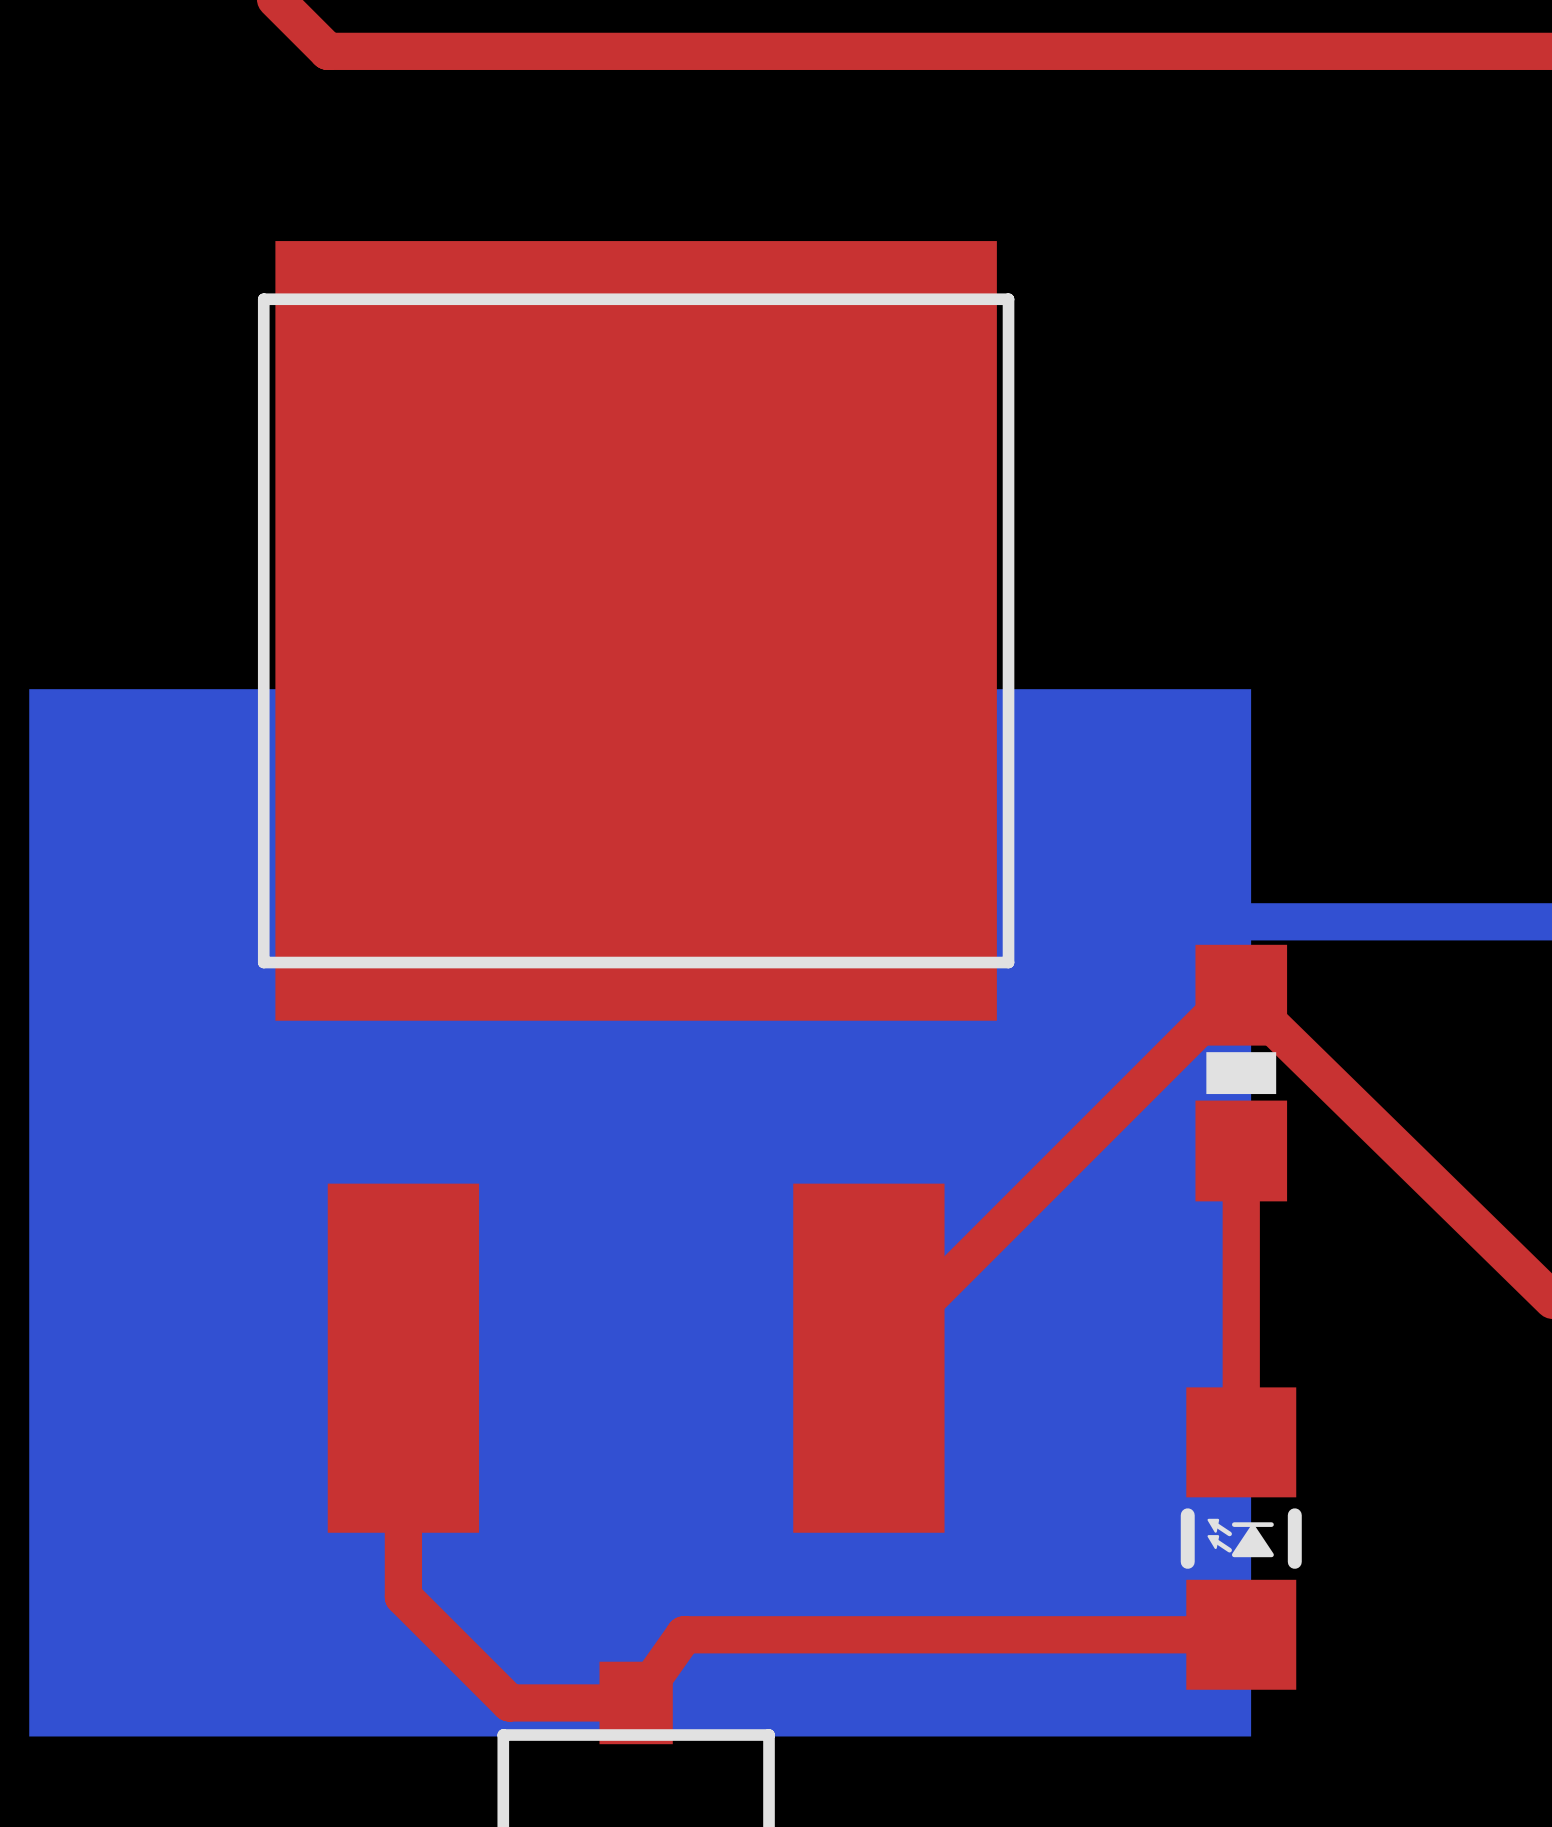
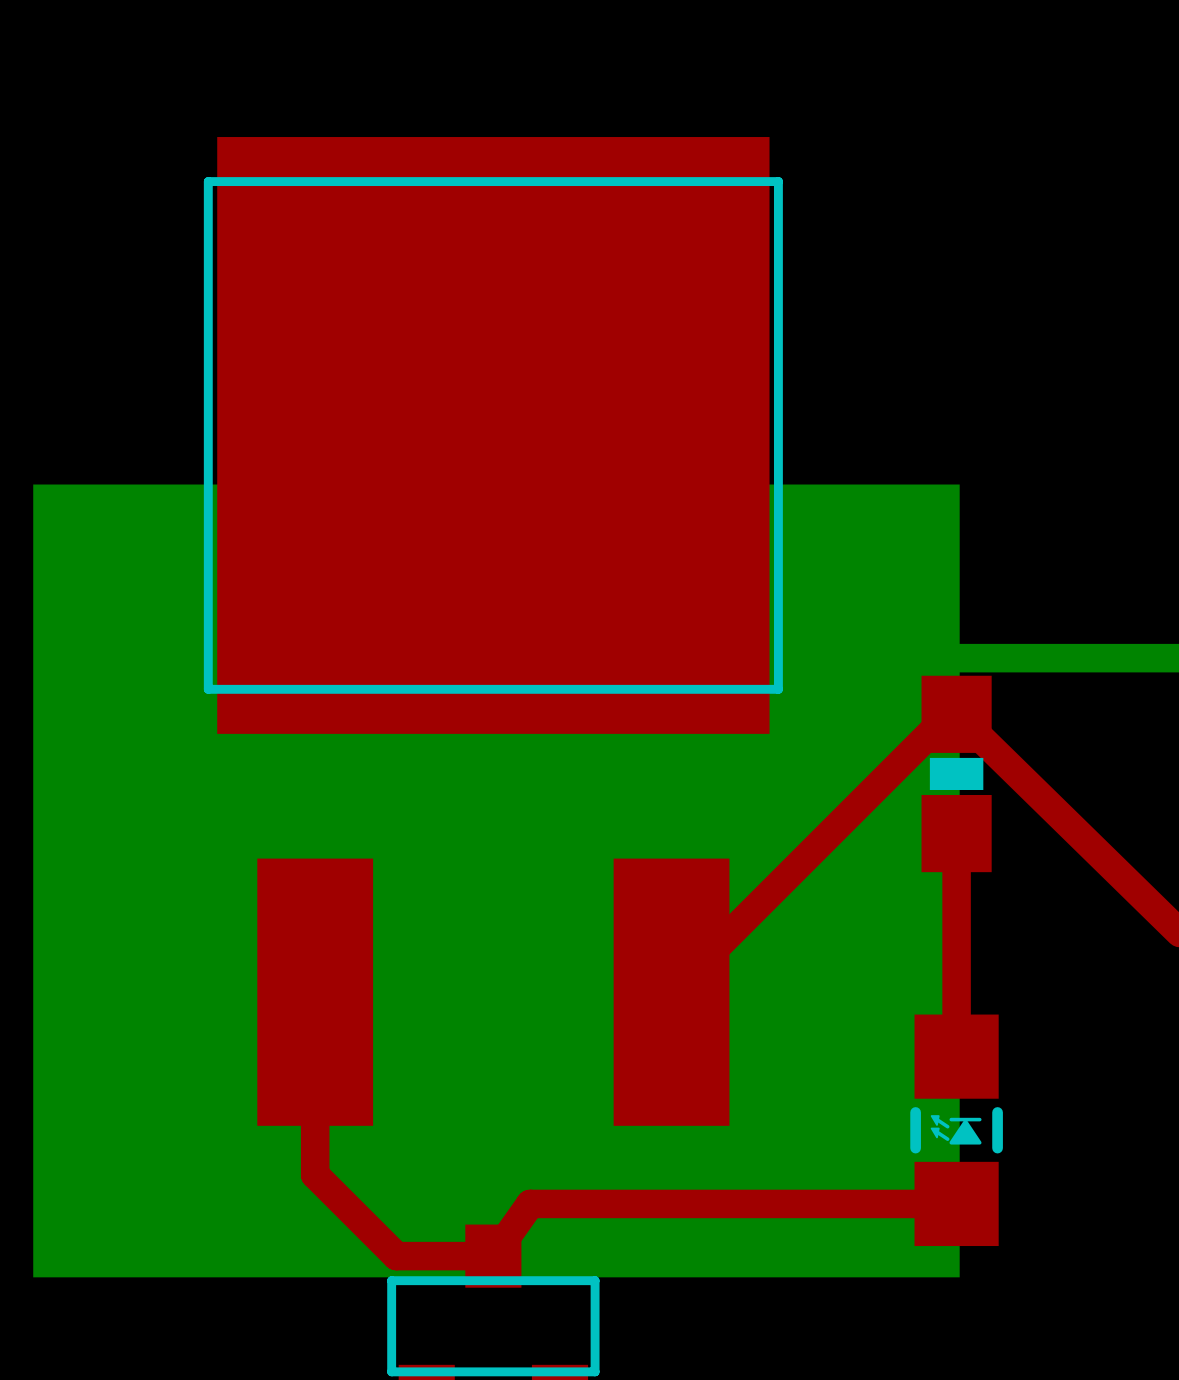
part footprint: [29, 689, 1252, 1737] -> [33, 484, 960, 1278]

